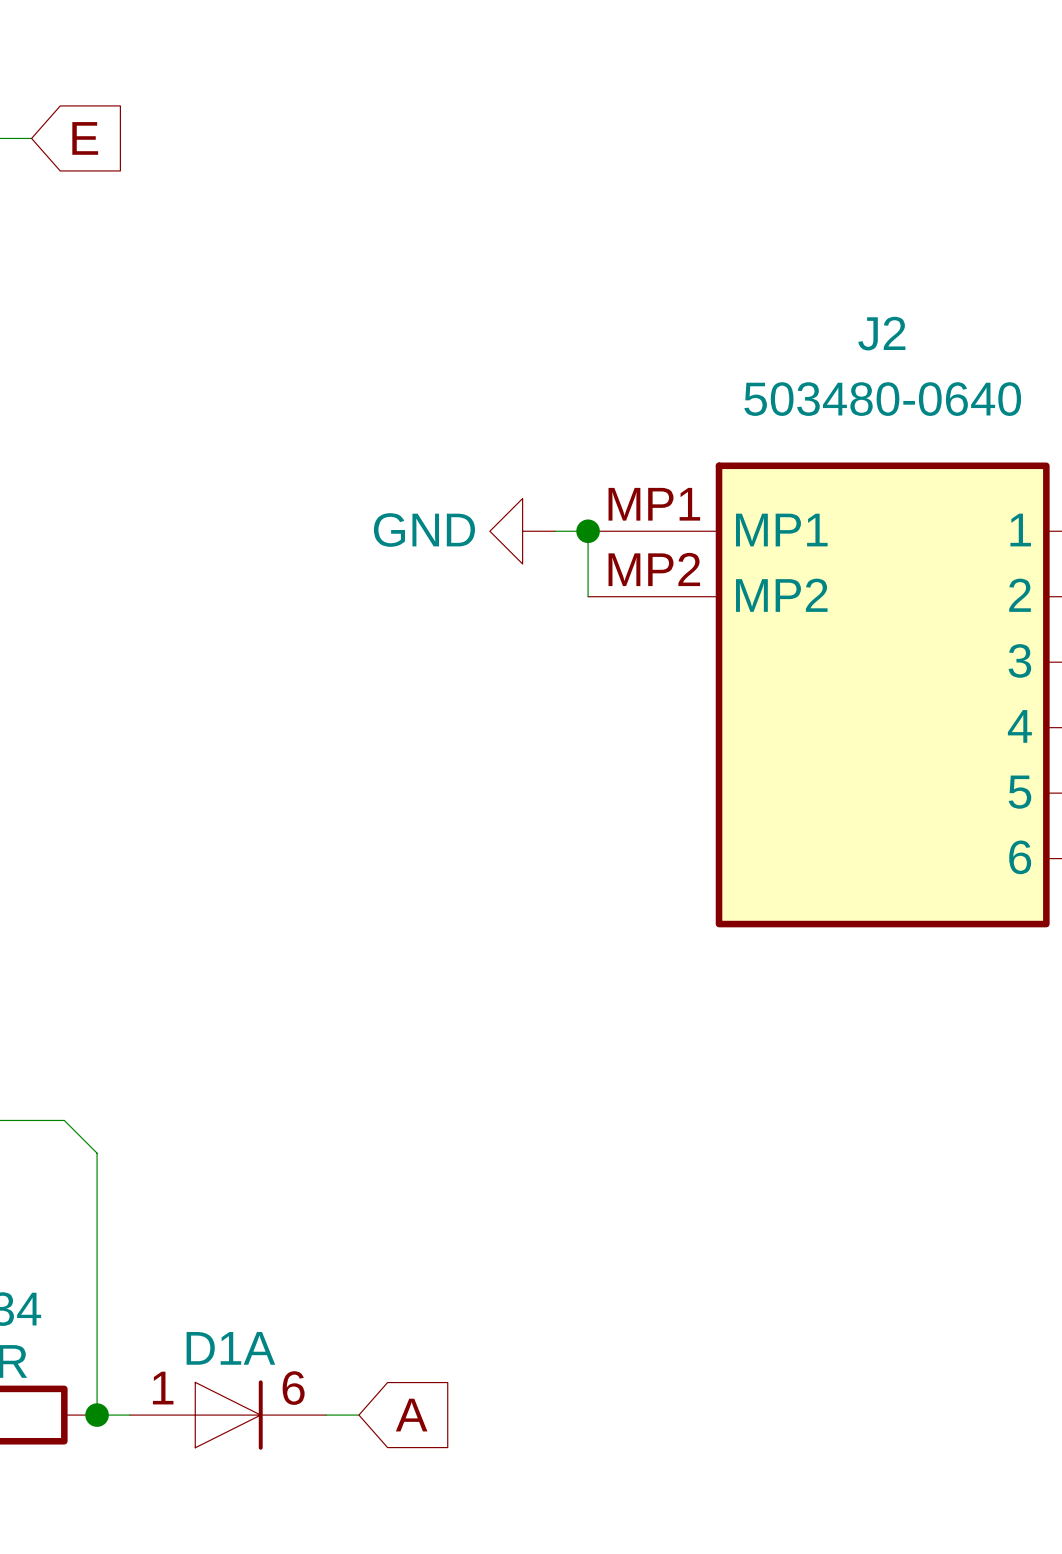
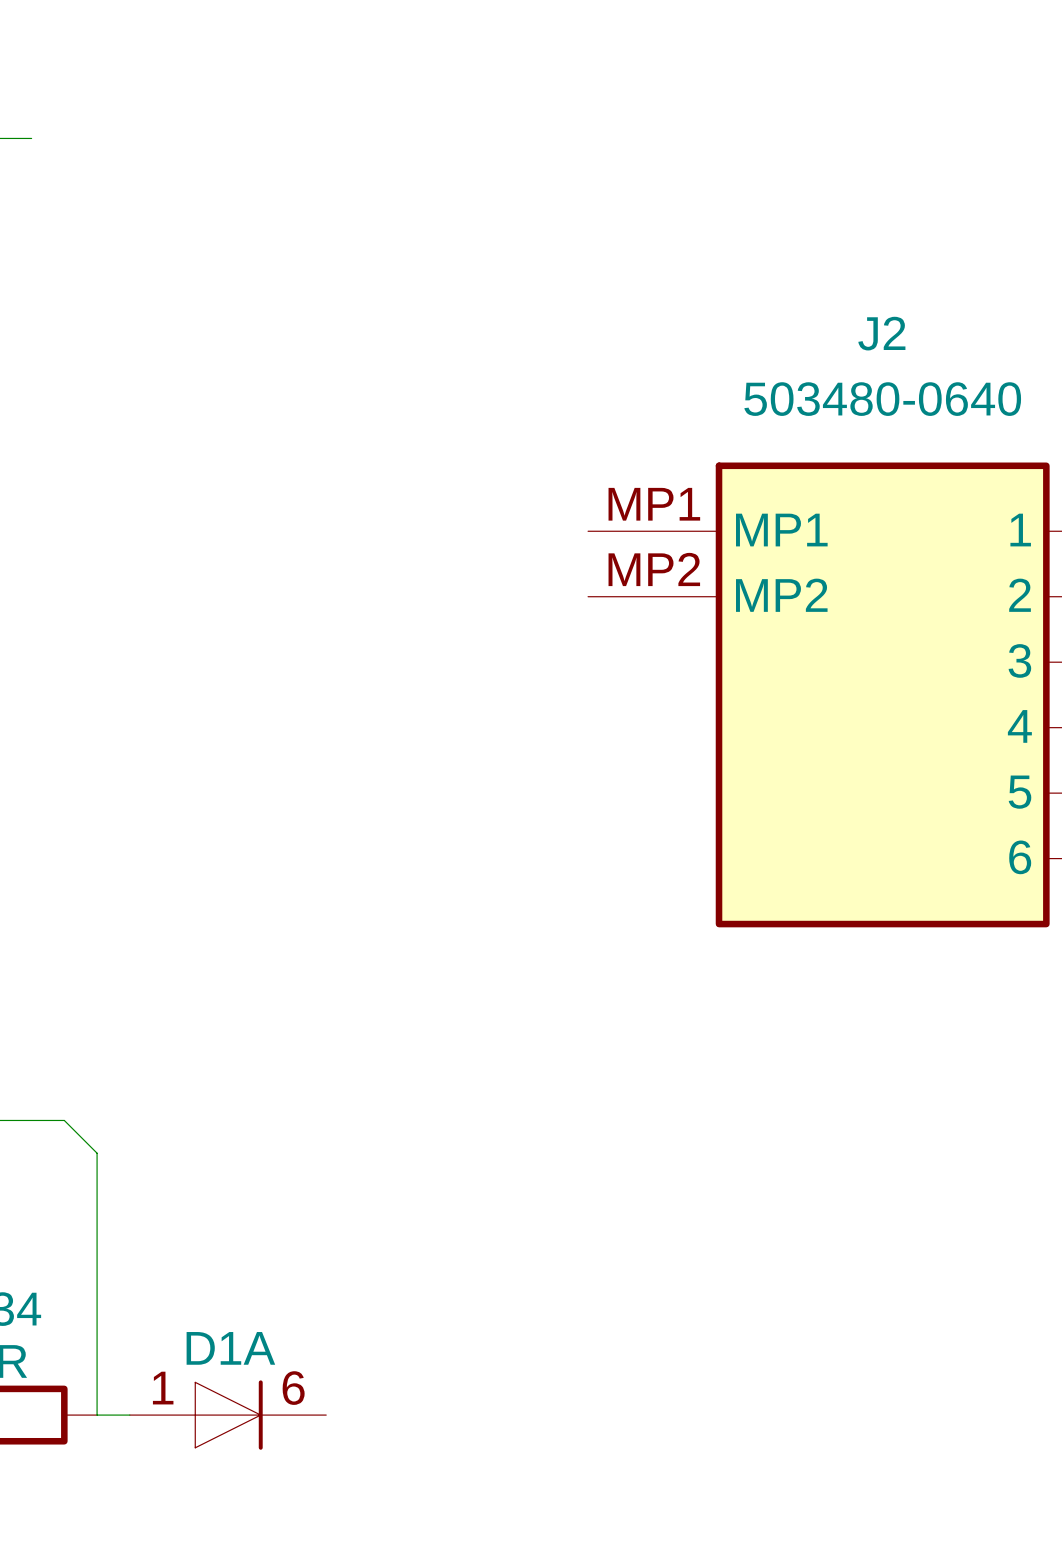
global label: E (85, 138) -> none
power symbol: GND (522, 531) -> none
wire: (555, 531) (588, 531) (588, 596) -> none
junction: (588, 531) -> none
junction: (97, 1415) -> none
wire: (326, 1415) (358, 1415) -> none
global label: A (411, 1415) -> none

